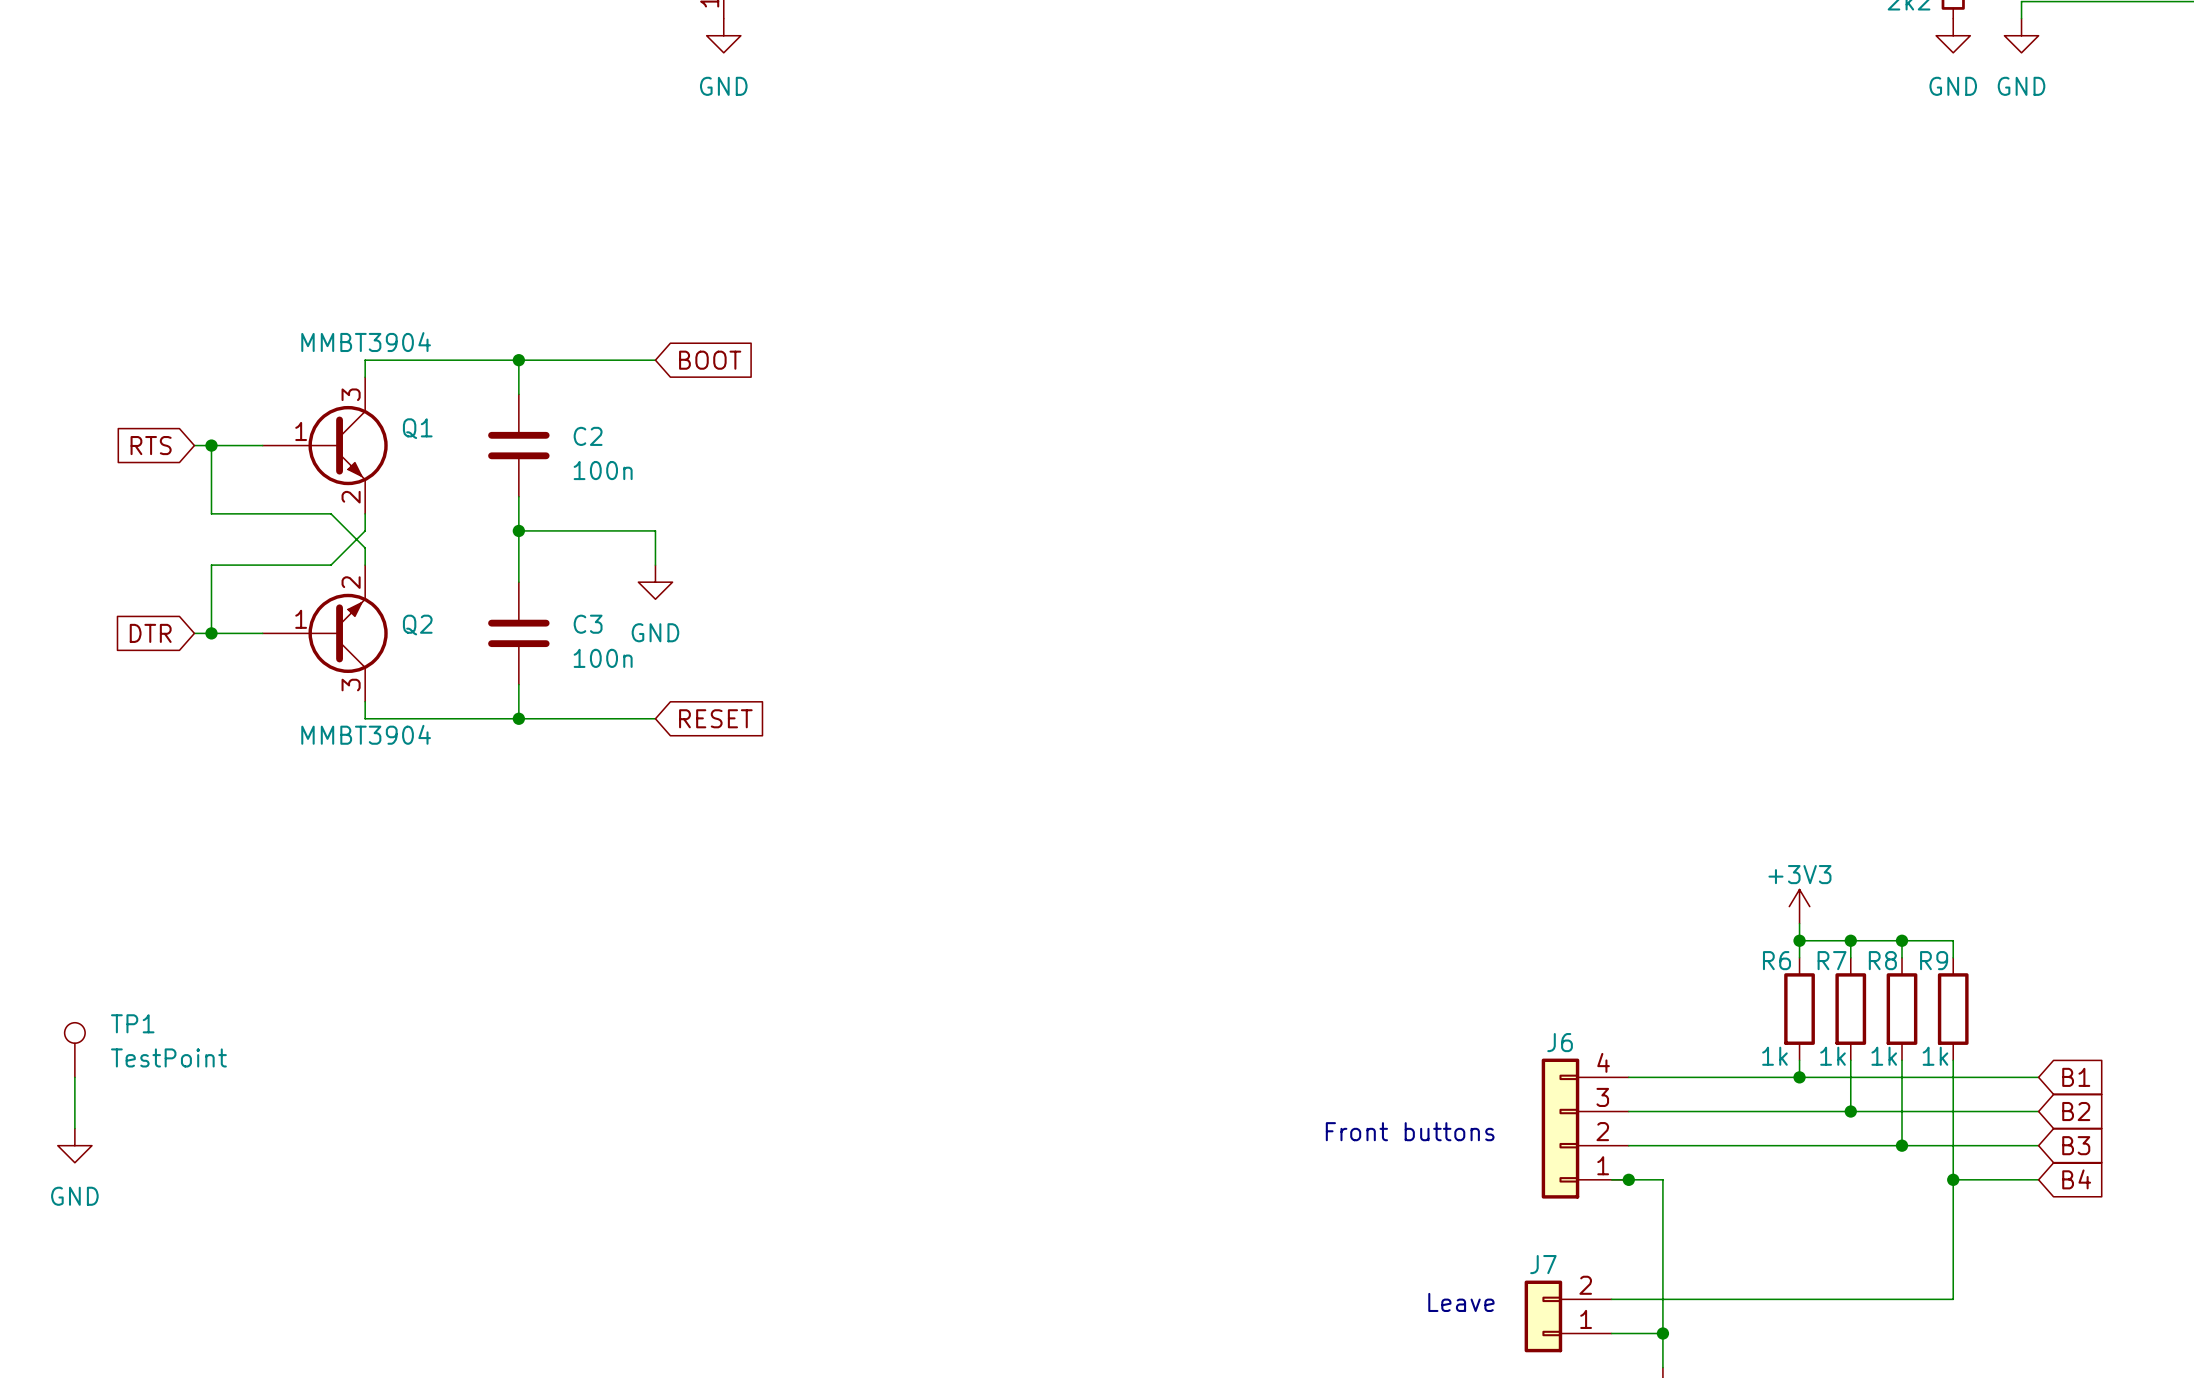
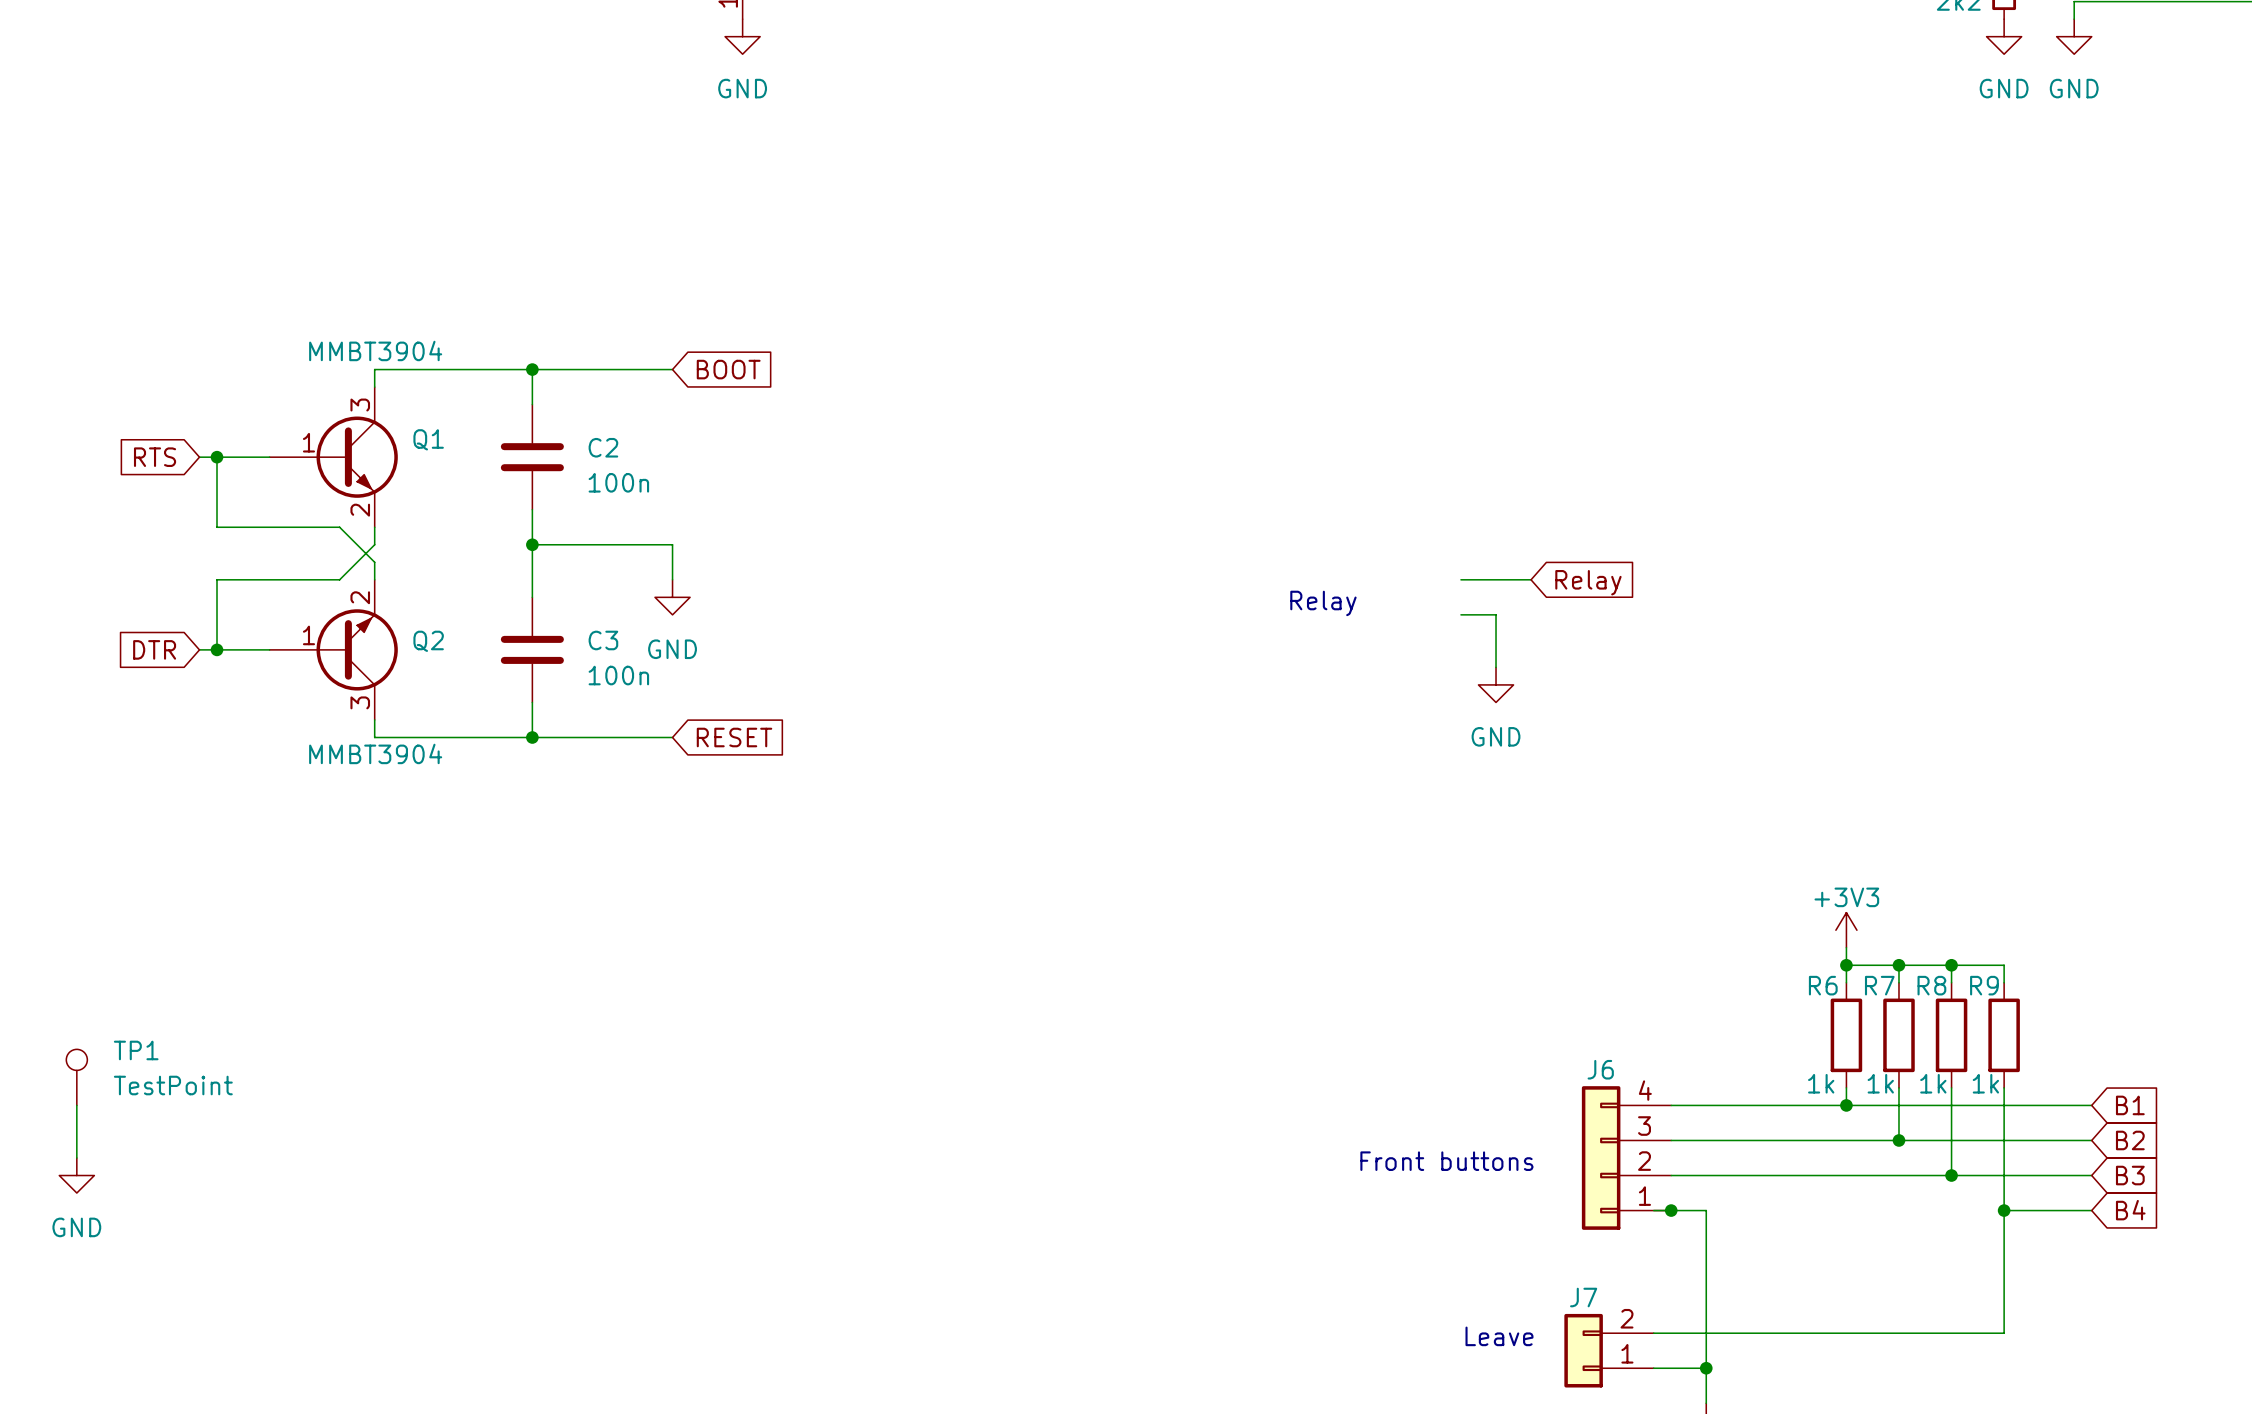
wire: none -> (1460, 579) (1531, 579)
global label: none -> Relay (1588, 582)
text: none -> Relay (1323, 603)
wire: none -> (1460, 614) (1496, 614) (1496, 667)
power symbol: none -> GND (1496, 684)

